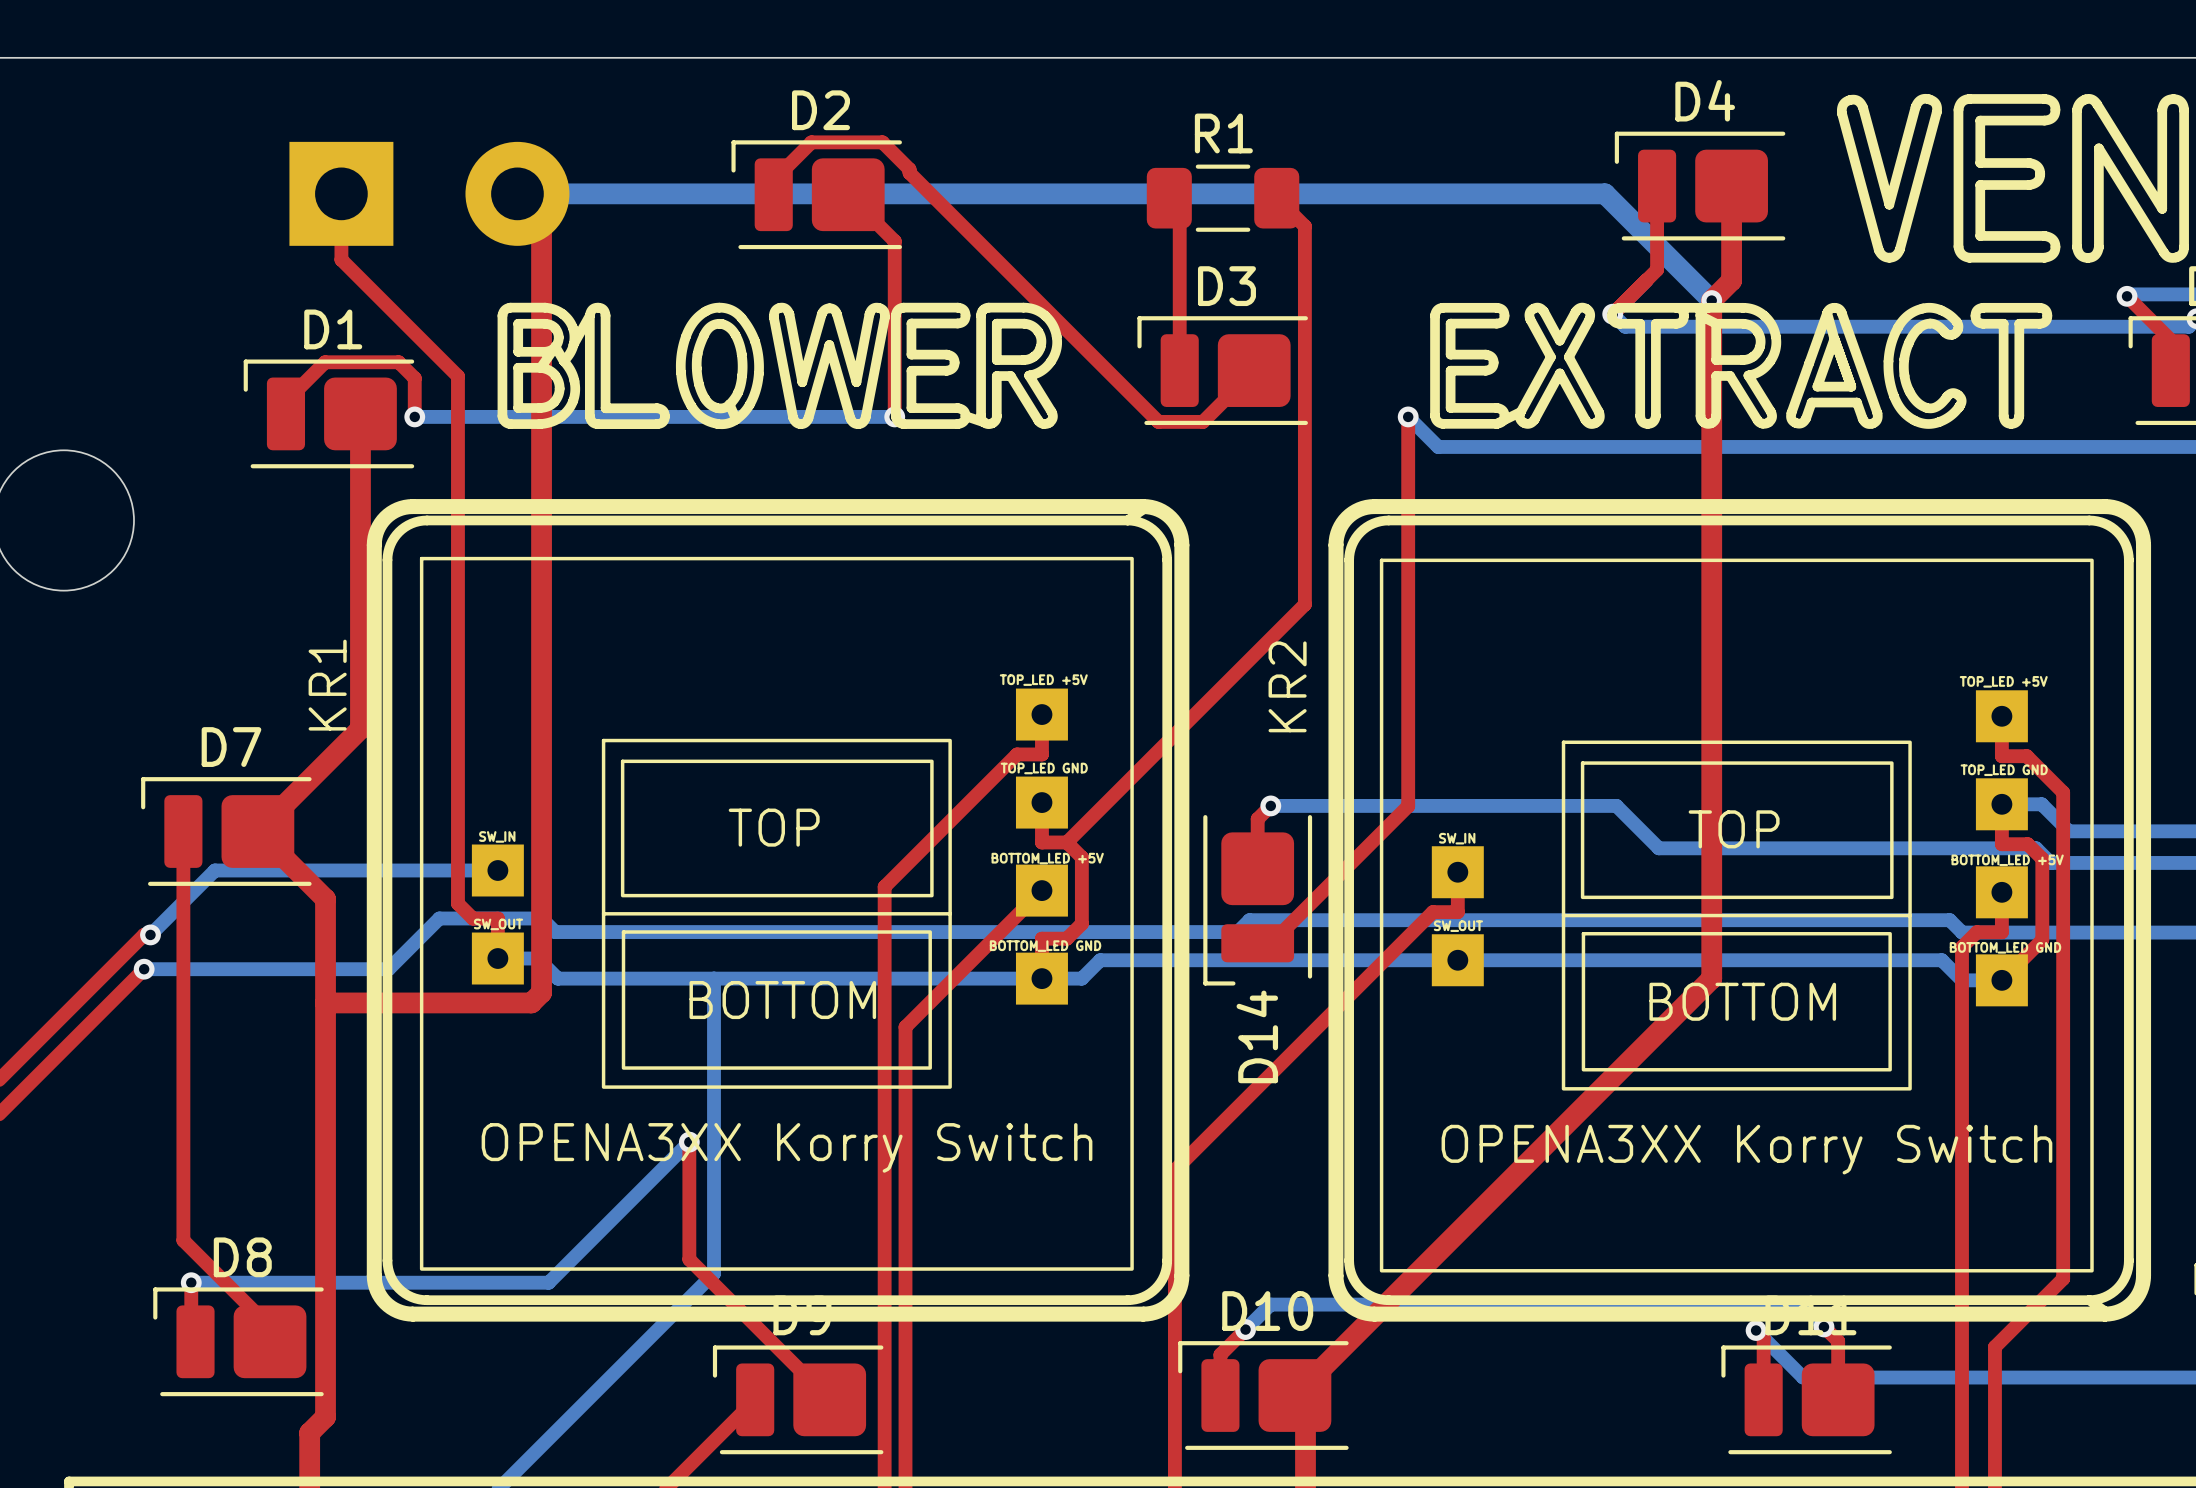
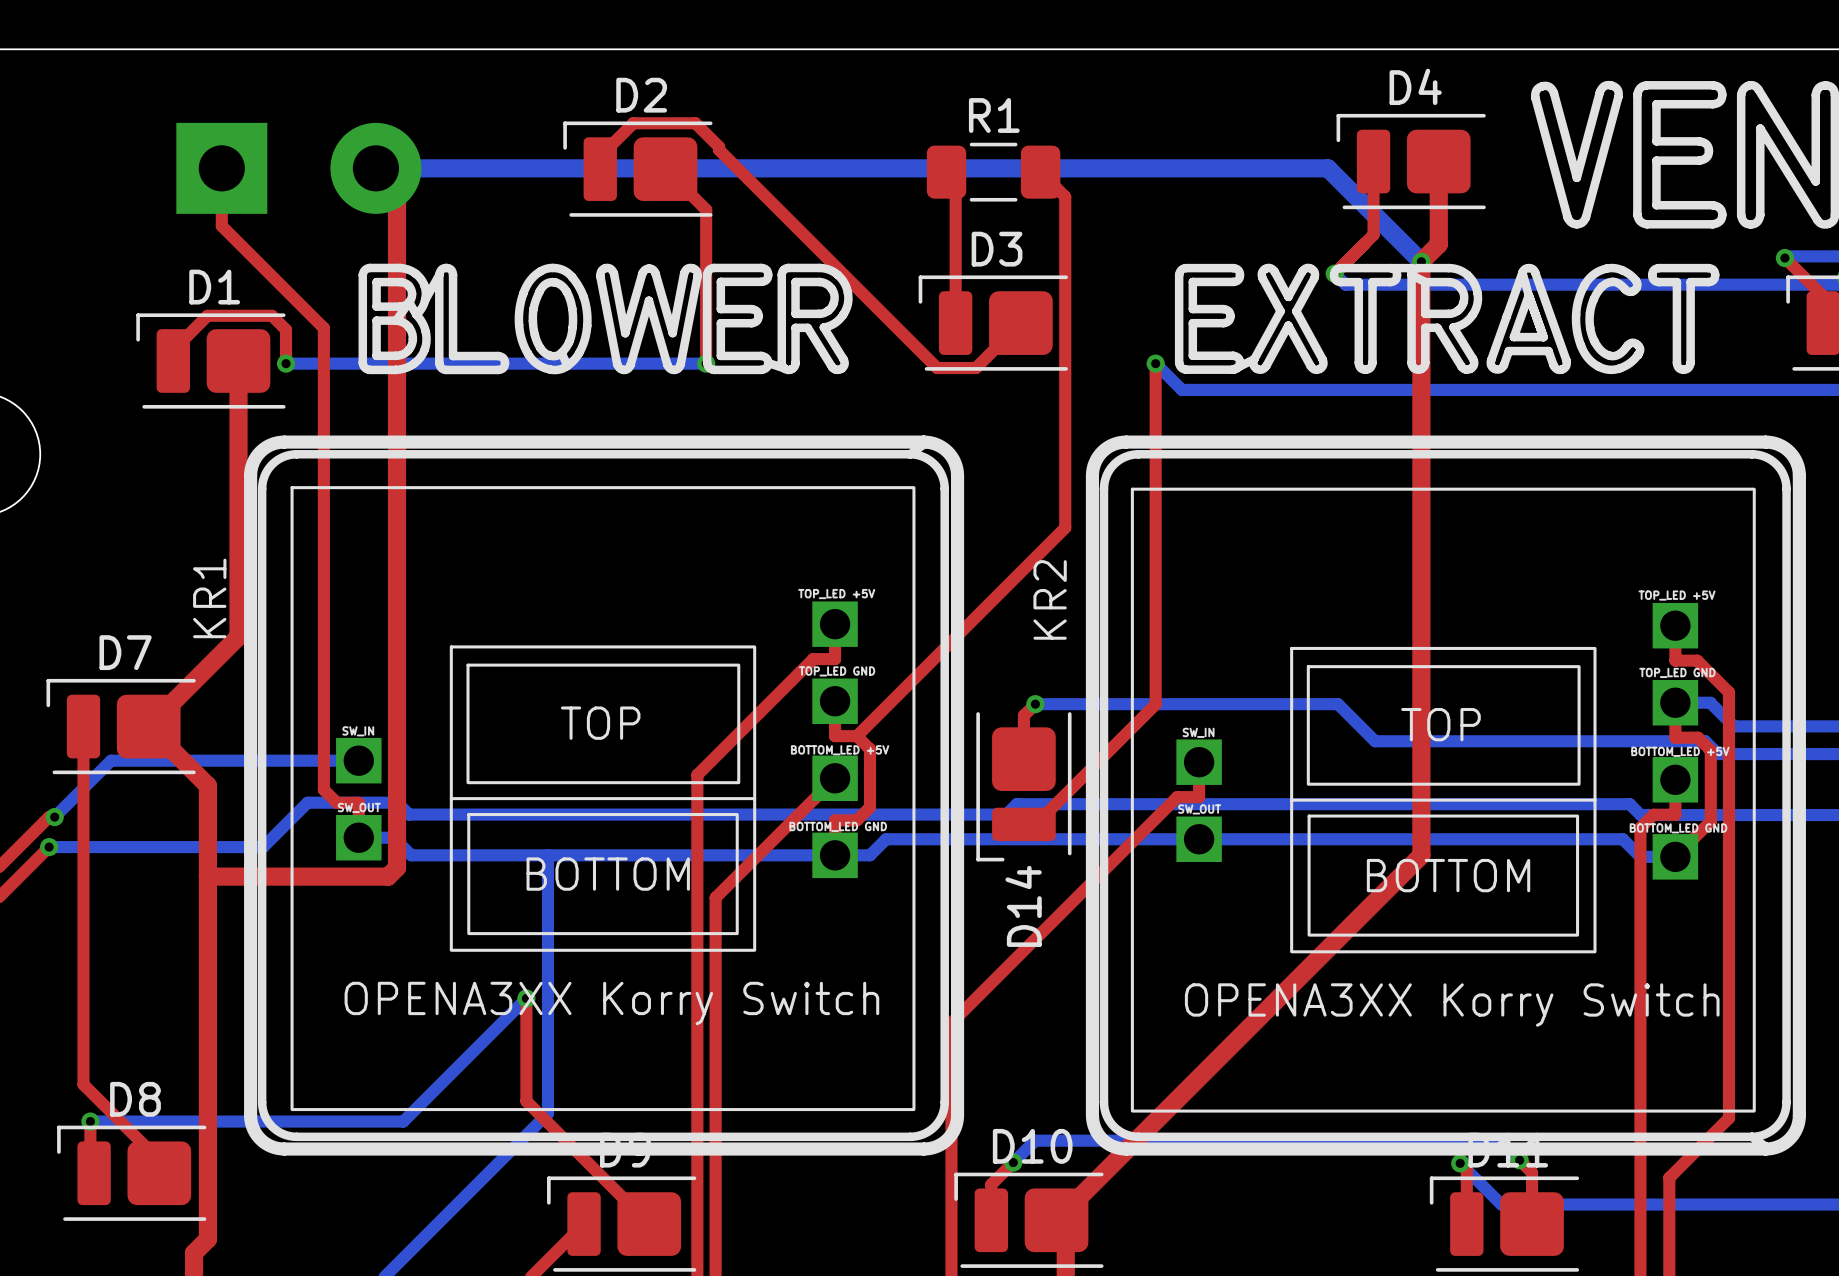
KR1 footprint: [419, 556, 1134, 1271] -> [290, 486, 916, 1112]
KR2 footprint: [1379, 558, 2094, 1273] -> [1130, 487, 1756, 1113]

